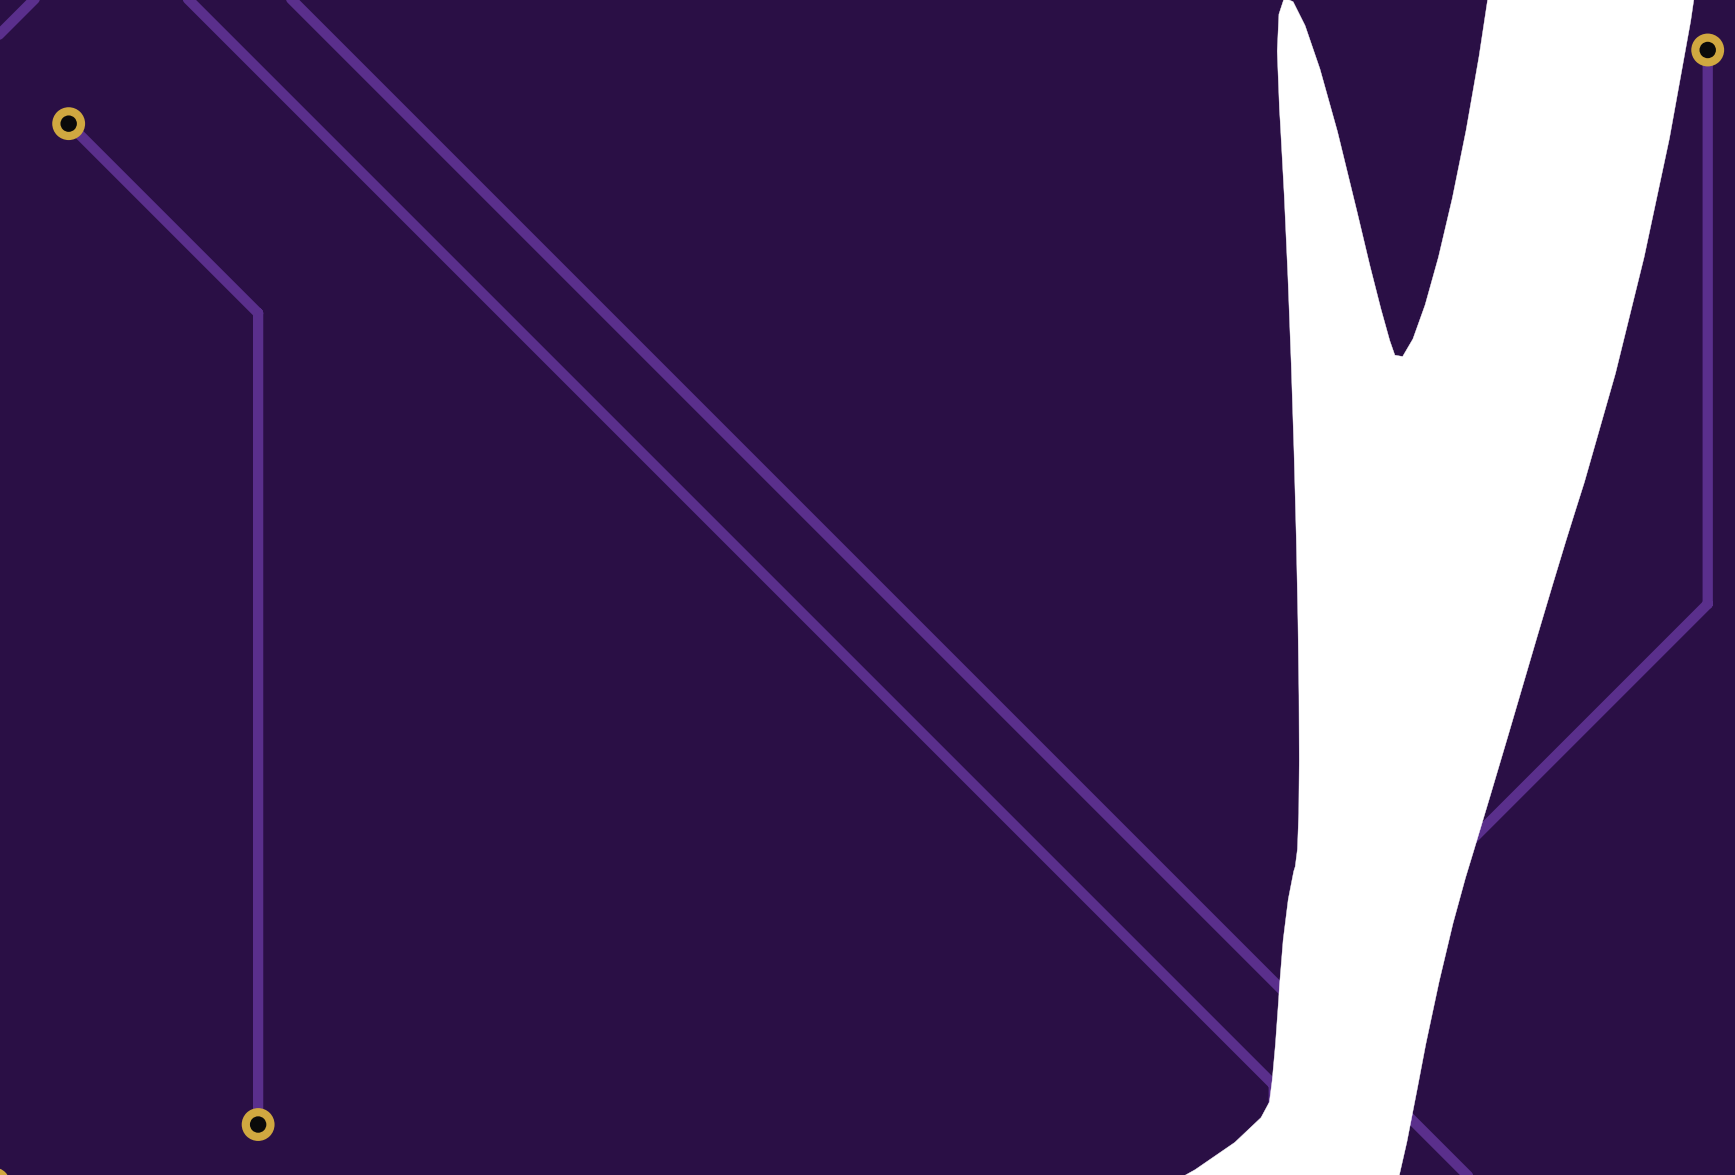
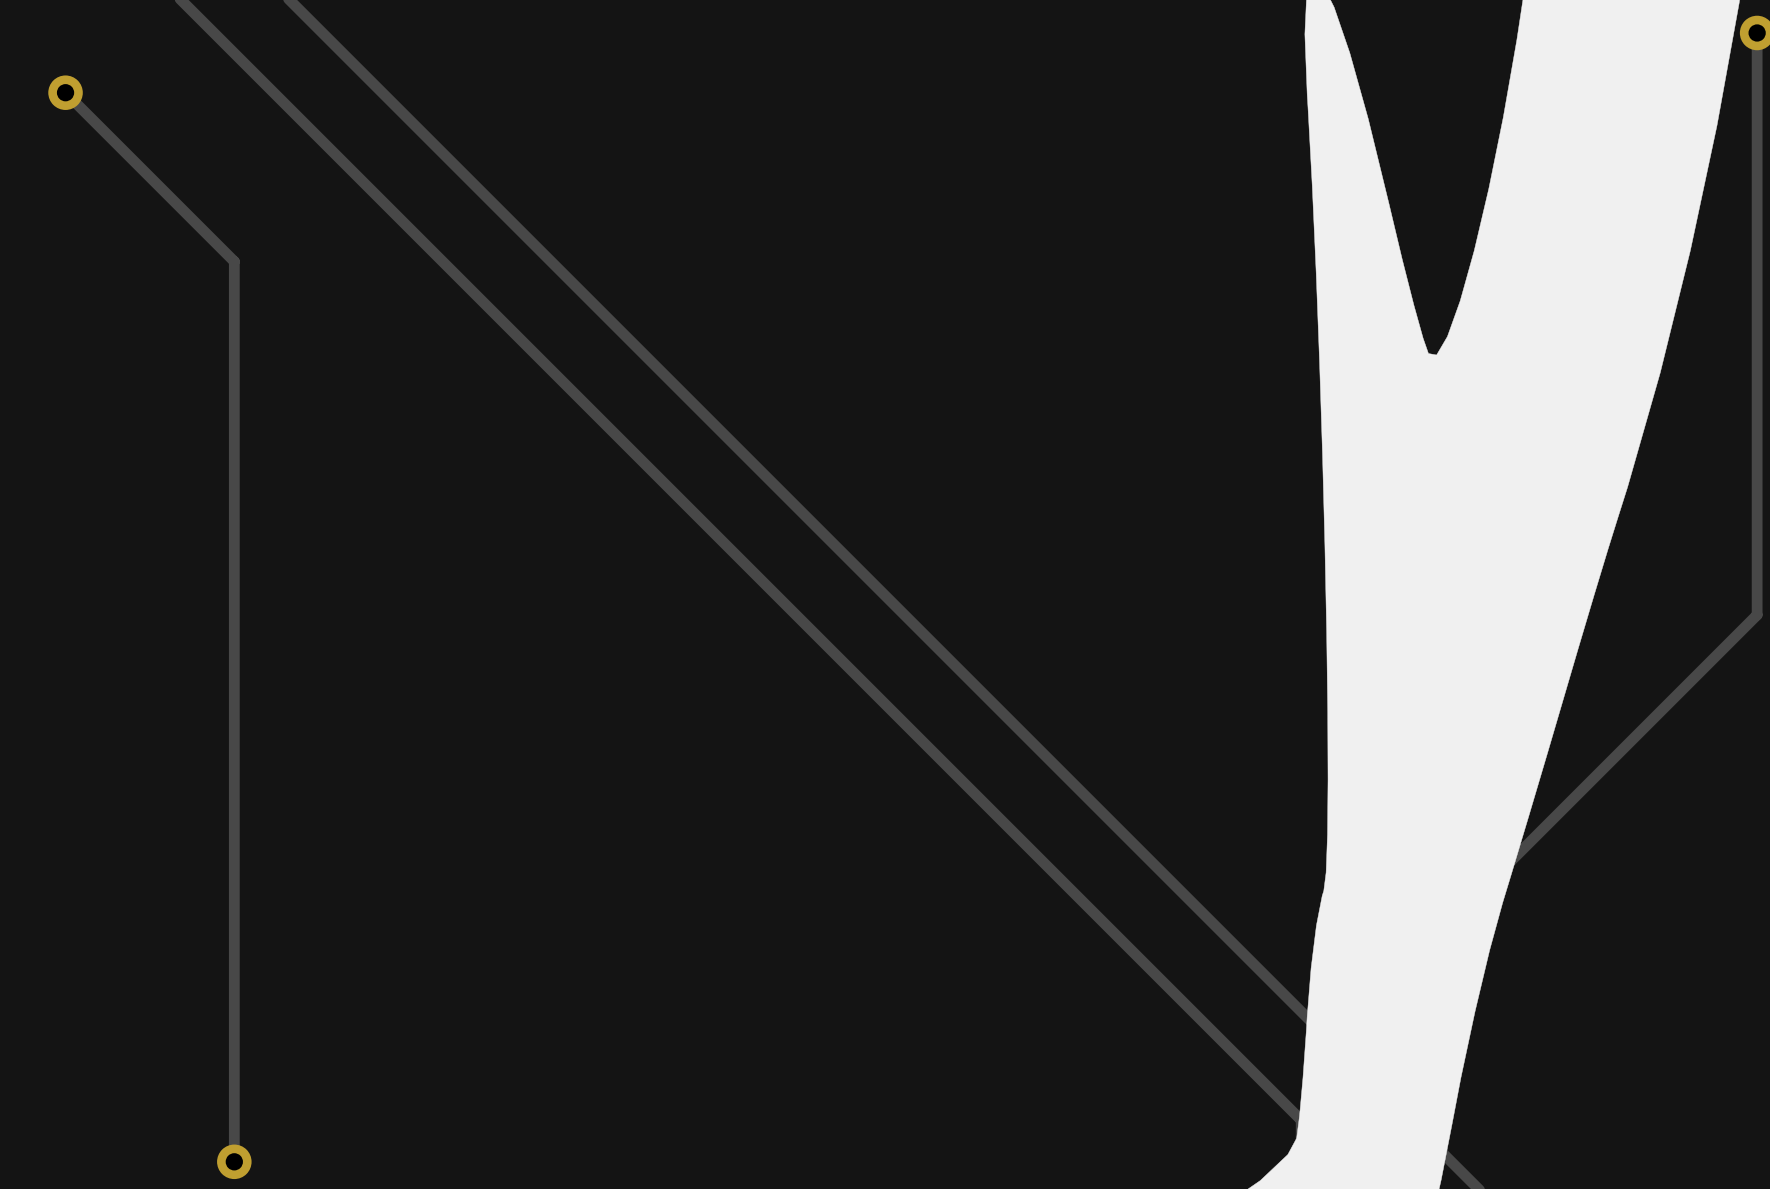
track: (68, 123) (258, 313) -> (65, 92) (234, 261) (234, 309)
via position: (68, 123) -> (65, 92)

